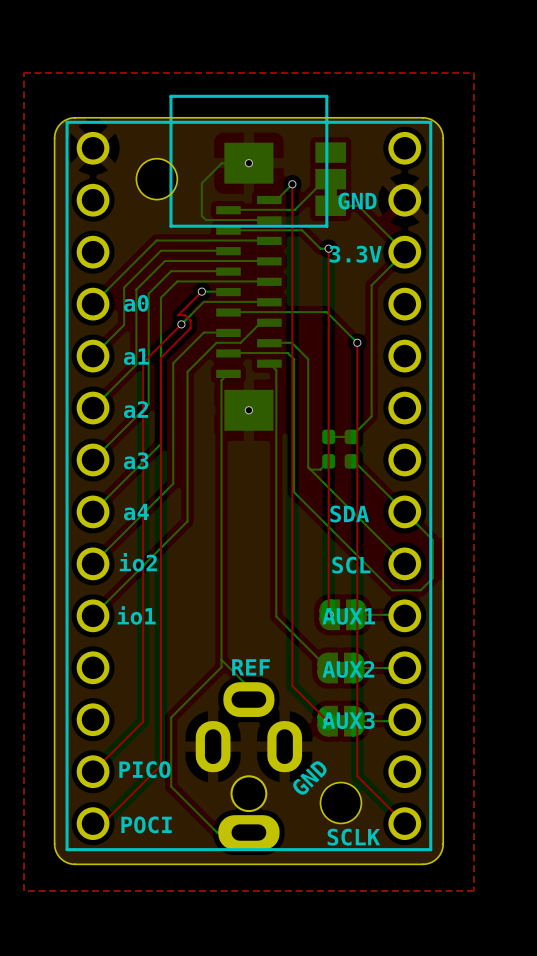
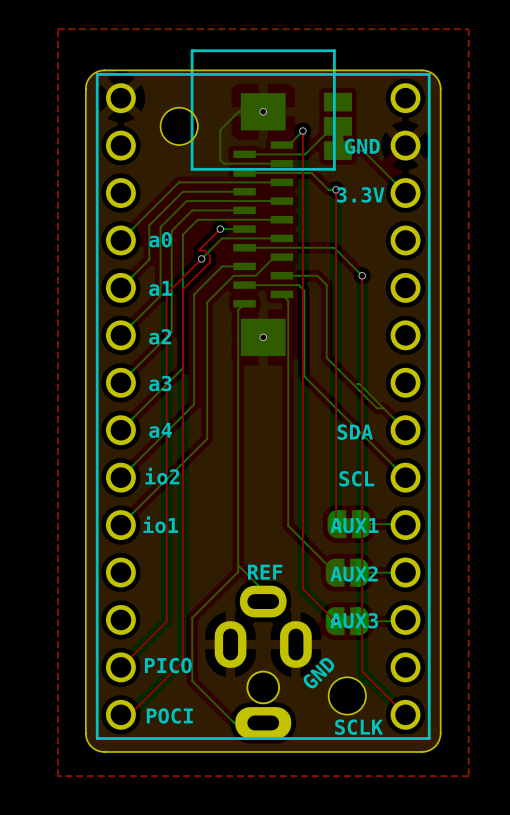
bottom track: (404, 252) (371, 285) (371, 416) (351, 436) (328, 436) -> none
bottom track: (291, 342) (308, 359) (308, 467) -> (302, 275) (317, 275) (326, 285) (326, 357) (377, 408) (383, 408)
part: (328, 449) -> none
part: (351, 449) -> none
bottom track: (293, 453) (293, 492) (392, 590) (420, 590) (432, 577) (432, 540) (404, 511) -> (304, 376) (317, 389)
bottom track: (328, 461) (320, 469) (310, 469) -> none

